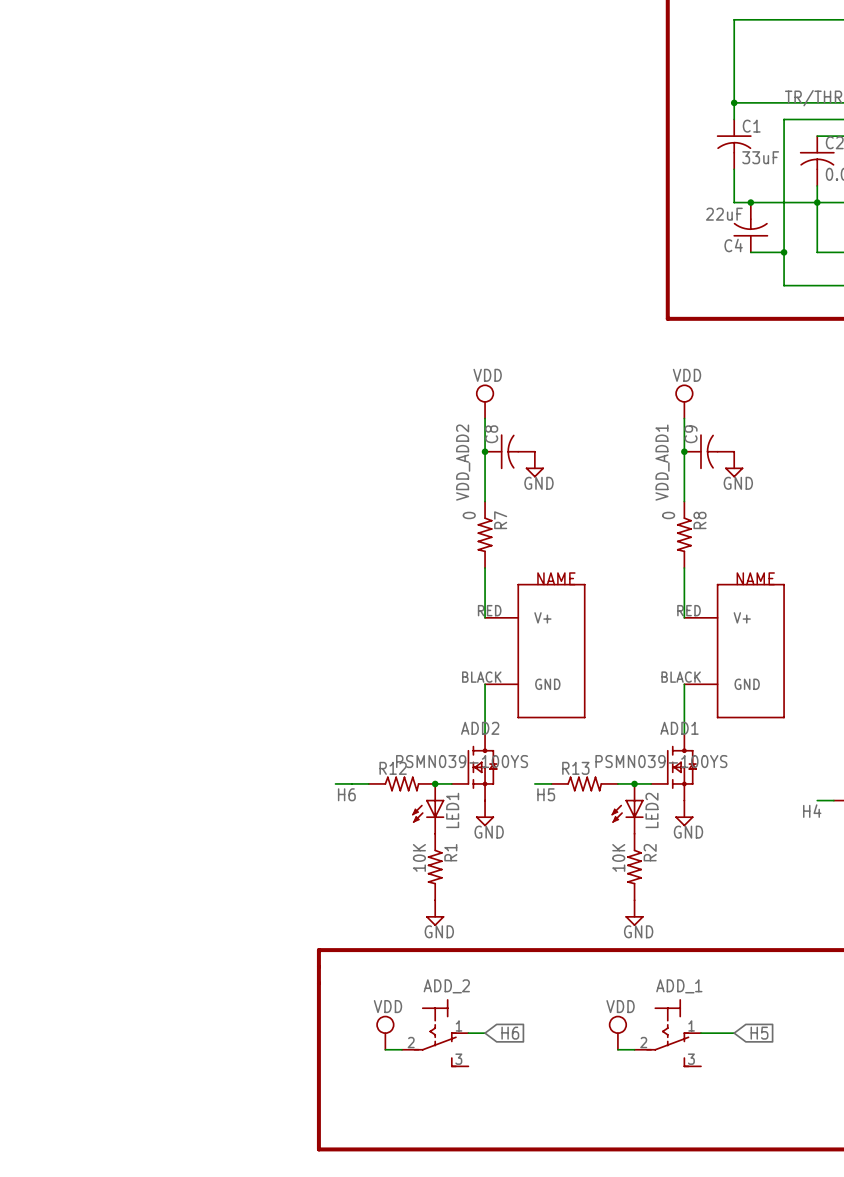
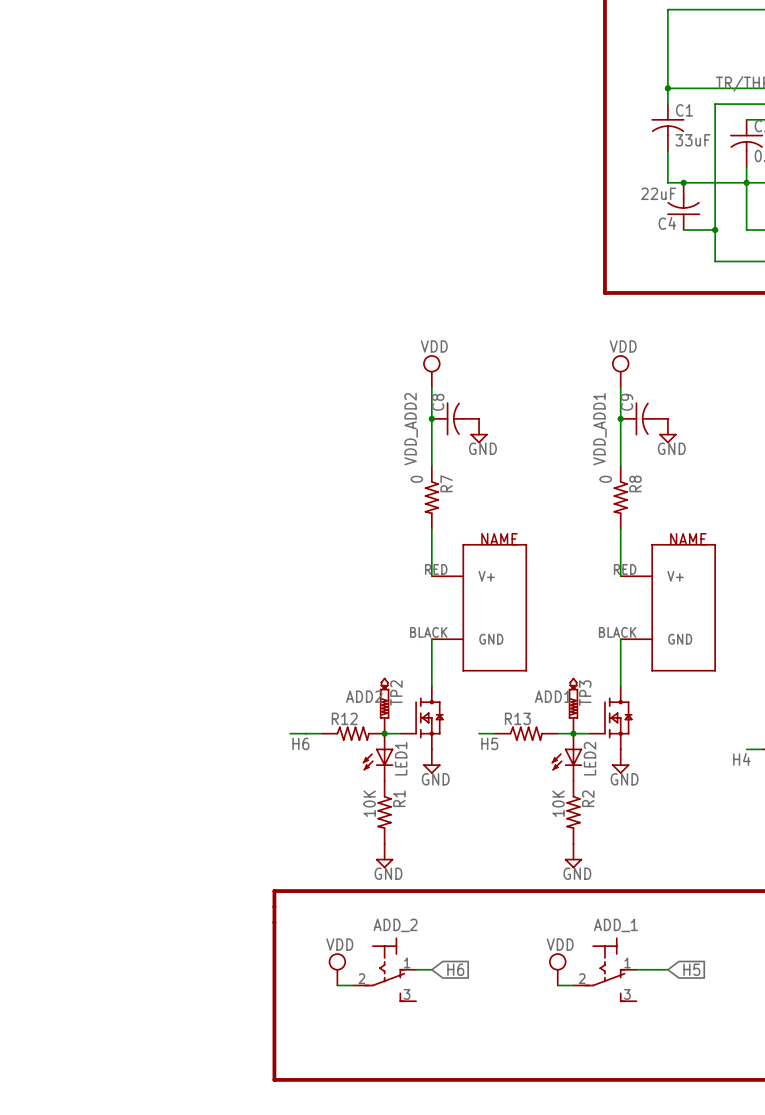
ADD2 name position: ADD2 (480, 728) -> ADD2 (364, 696)
ADD1 name position: ADD1 (679, 728) -> ADD1 (553, 696)
TP2: none -> (384, 705)
TP3: none -> (573, 705)
ADD2 value: PSMN039-100YS (462, 761) -> none
ADD1 value: PSMN039-100YS (661, 761) -> none

